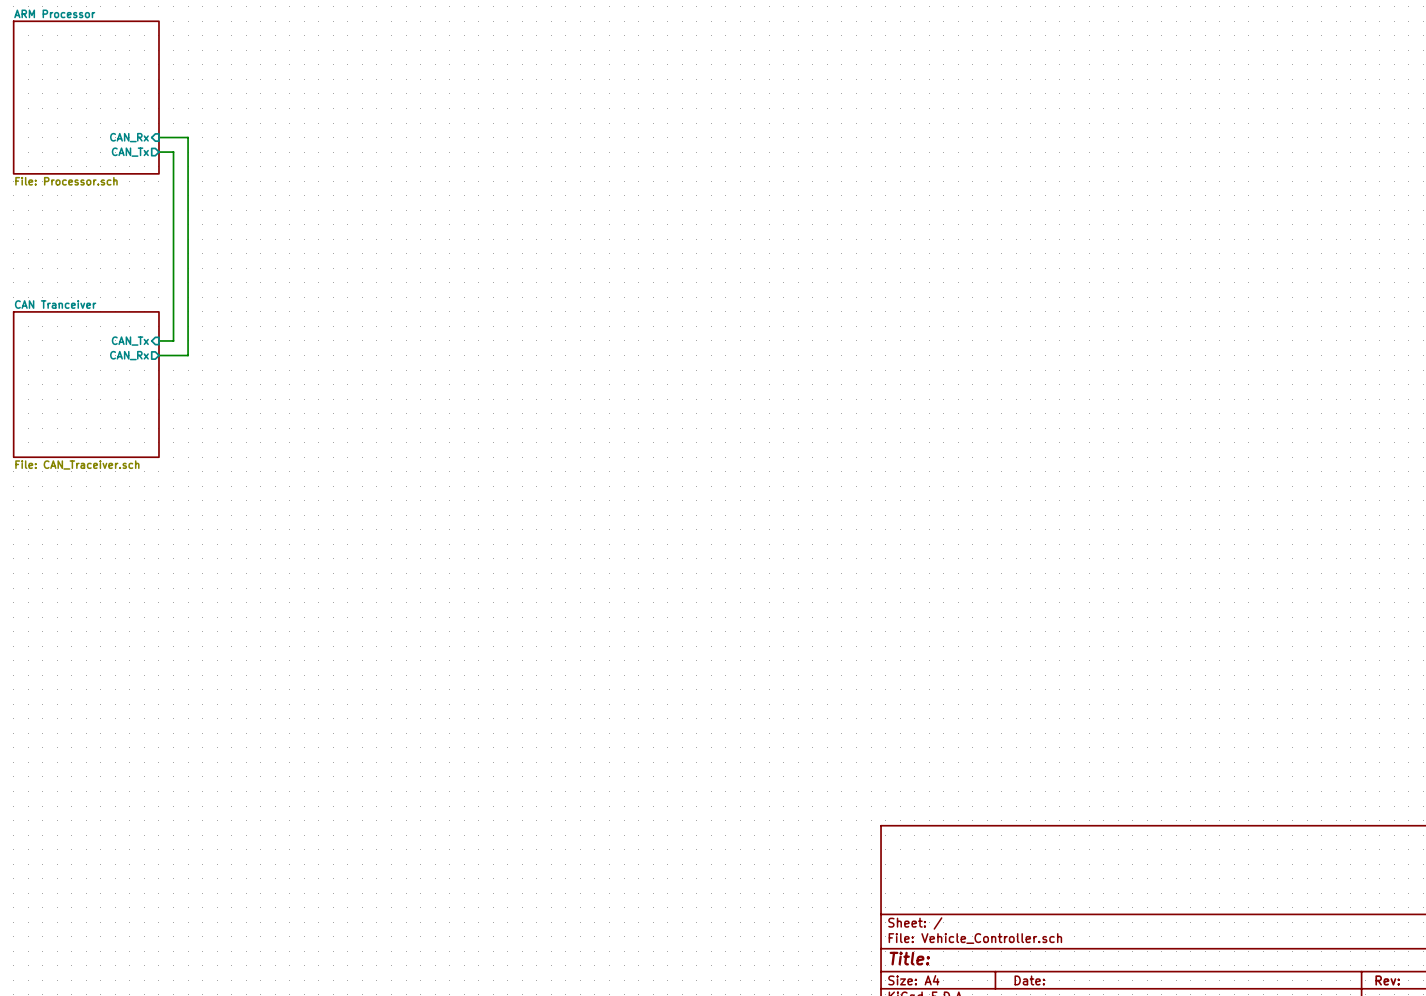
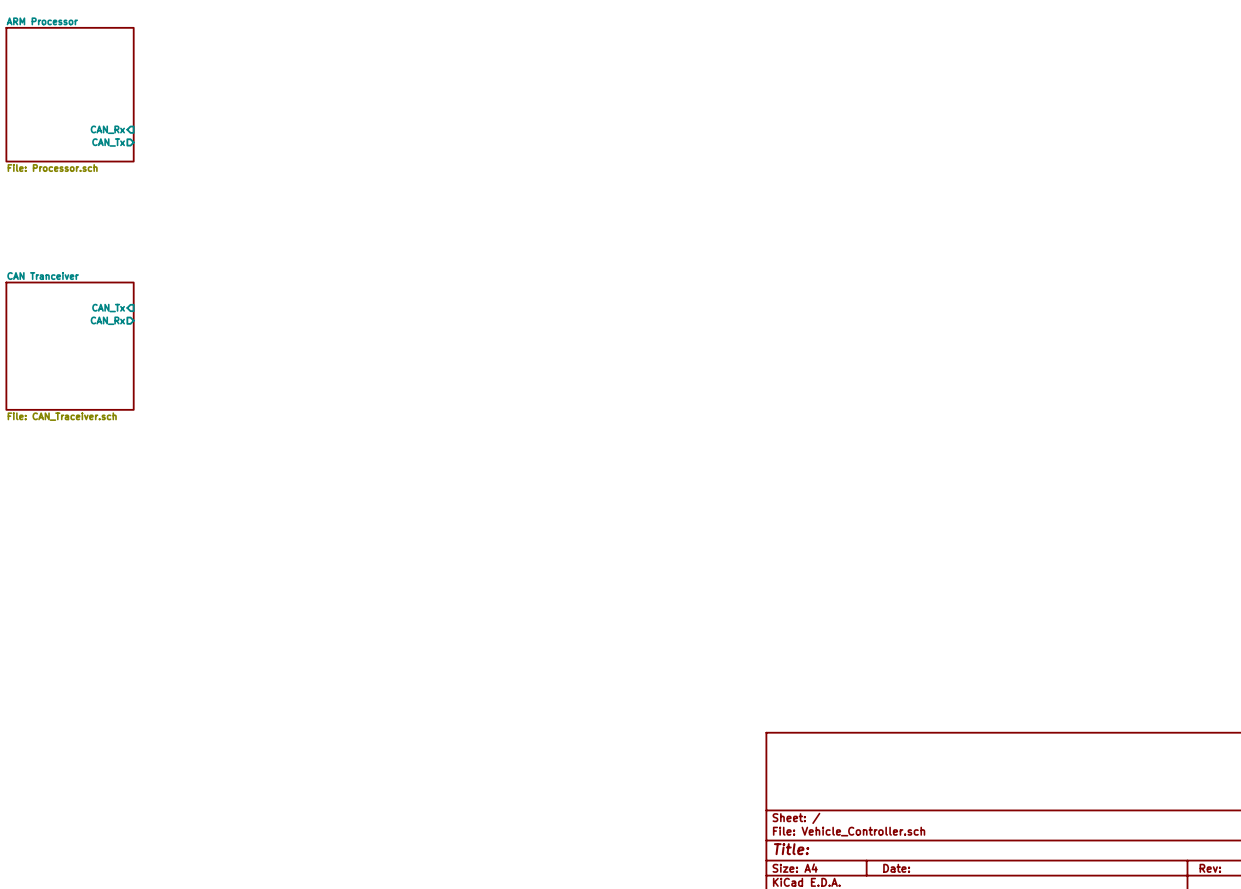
wire: (158, 137) (188, 137) (188, 355) (158, 355) -> none
wire: (158, 152) (173, 152) (173, 340) (158, 340) -> none

